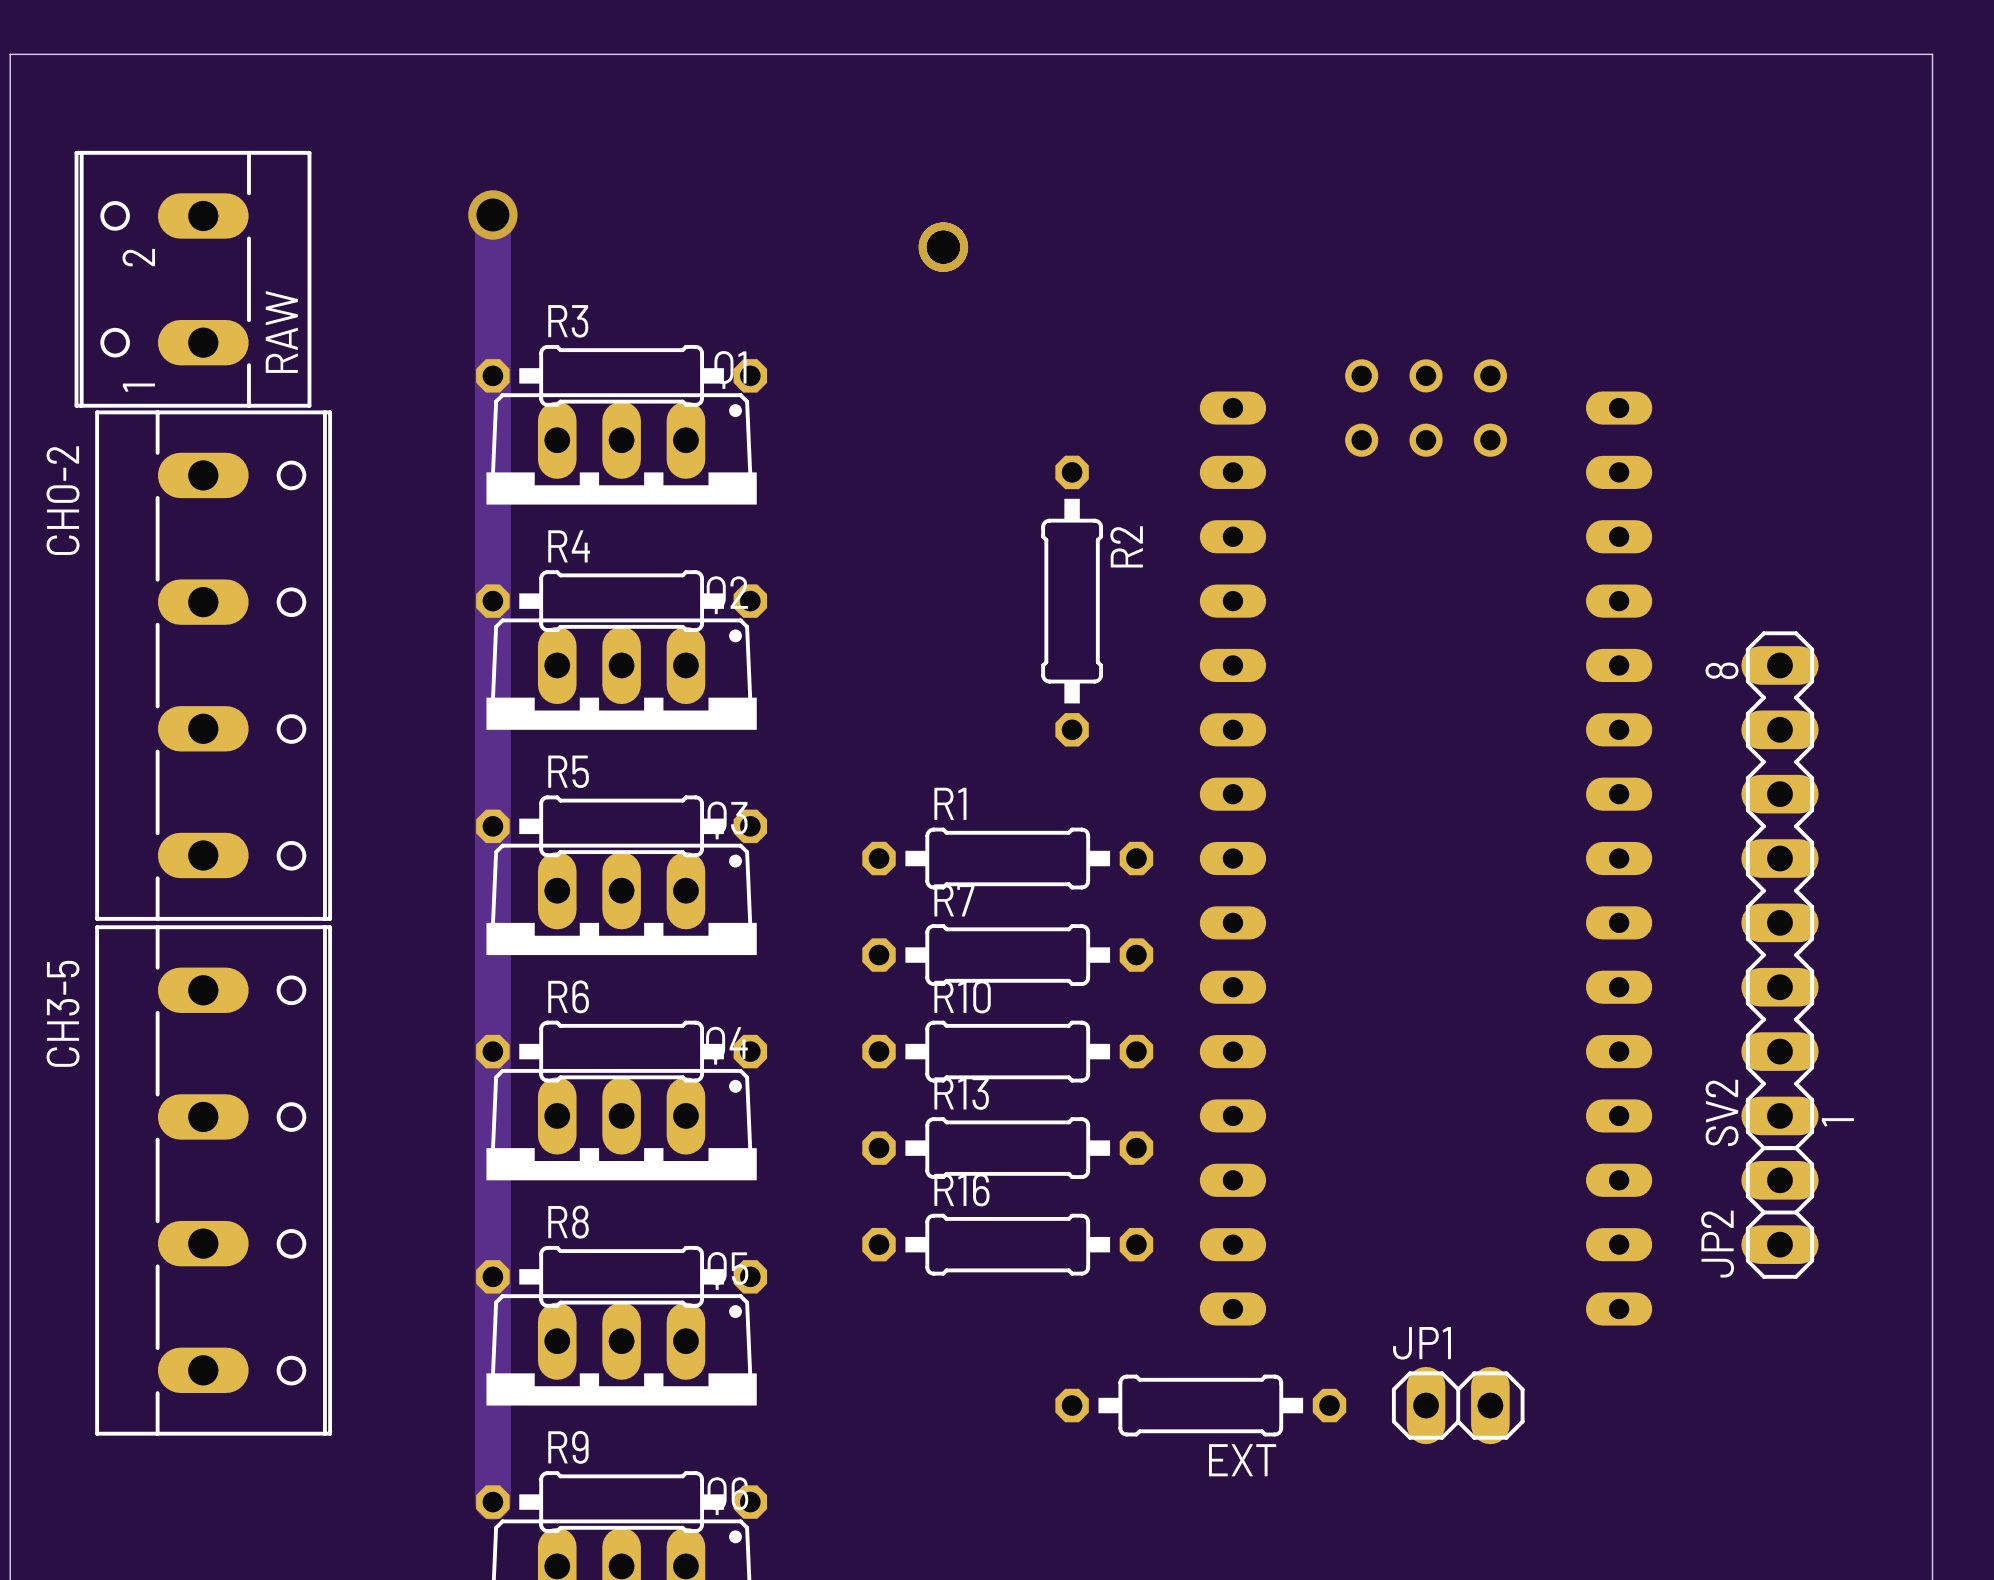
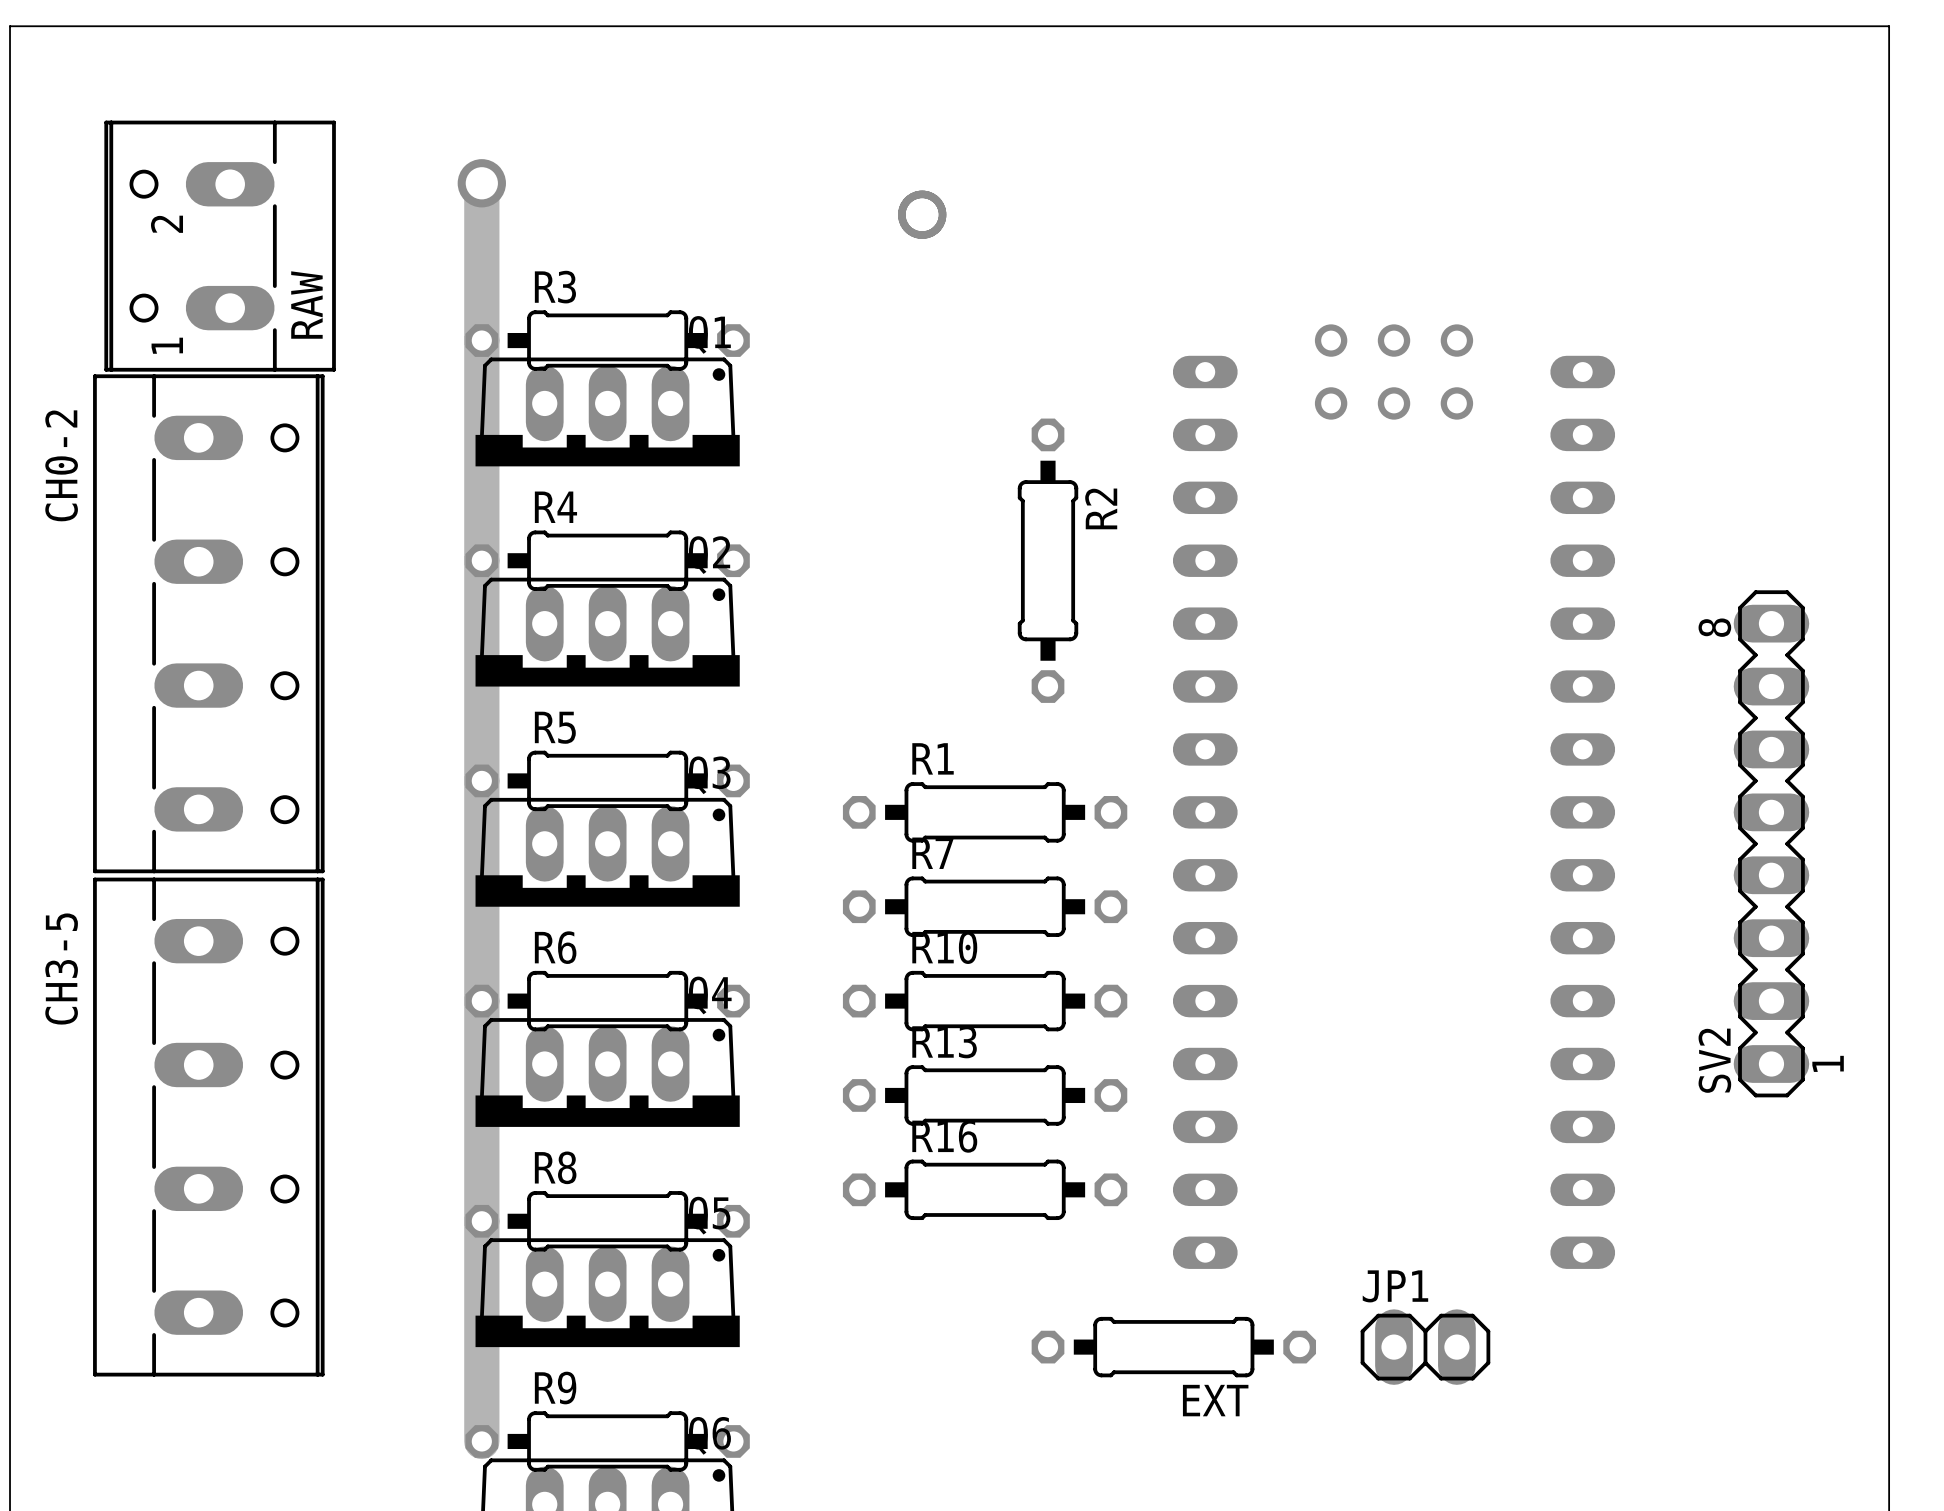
RAW position: (193, 279) -> (220, 246)
SV2 position: (1779, 890) -> (1771, 843)
JP2: (1779, 1212) -> none

